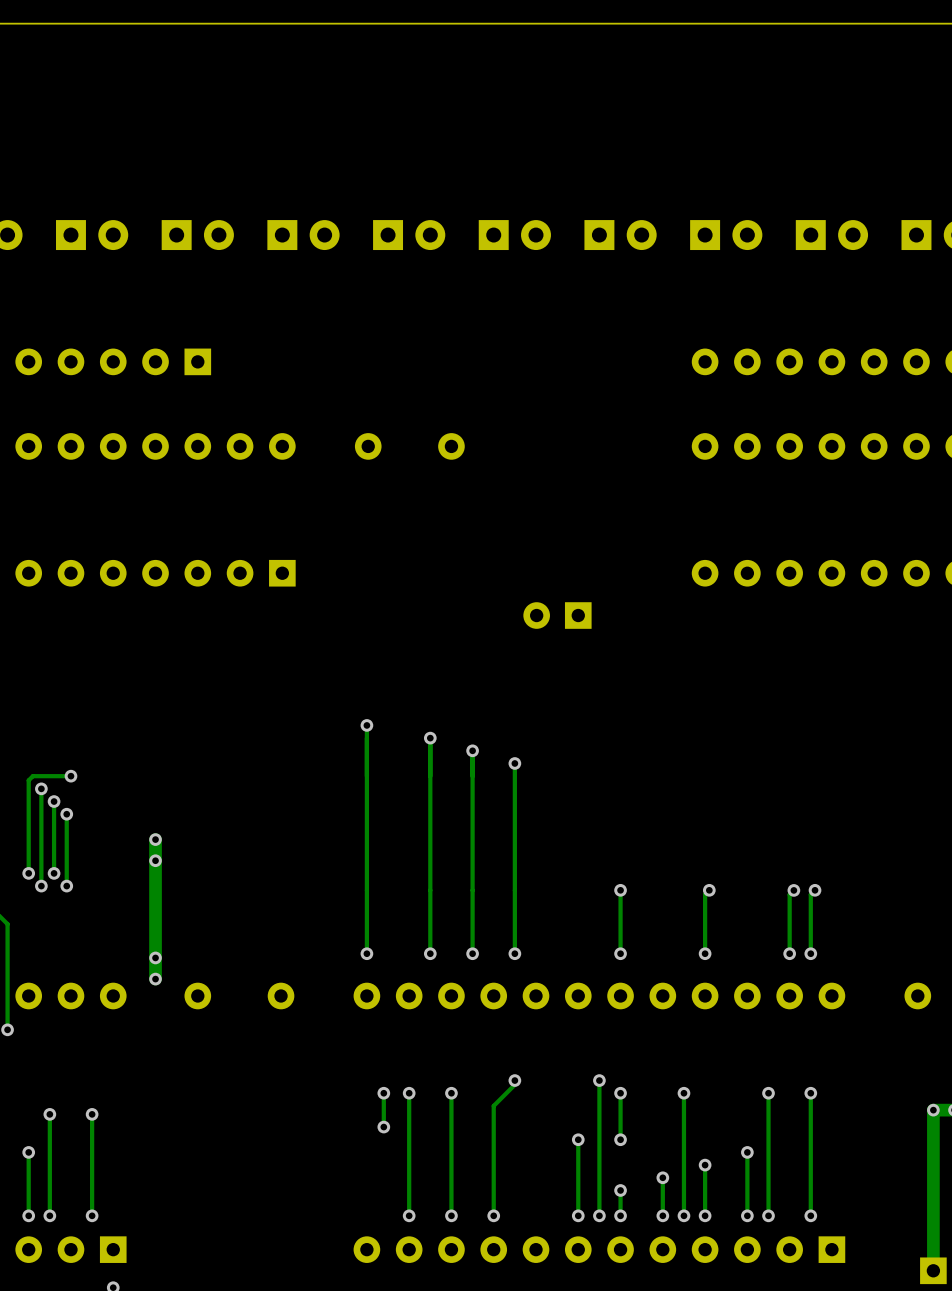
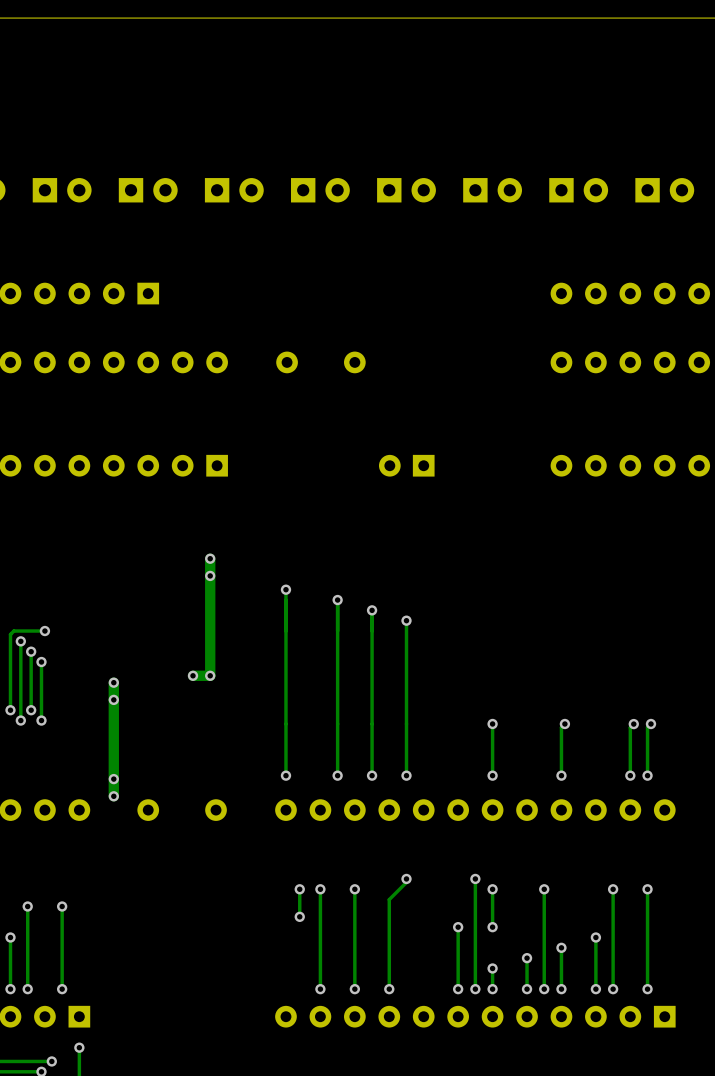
part position: (557, 615) -> (406, 465)
track: none -> (210, 558) (210, 675) (193, 675)
via: none -> (210, 558)
via: none -> (210, 575)
via: none -> (193, 675)
via: none -> (210, 675)

